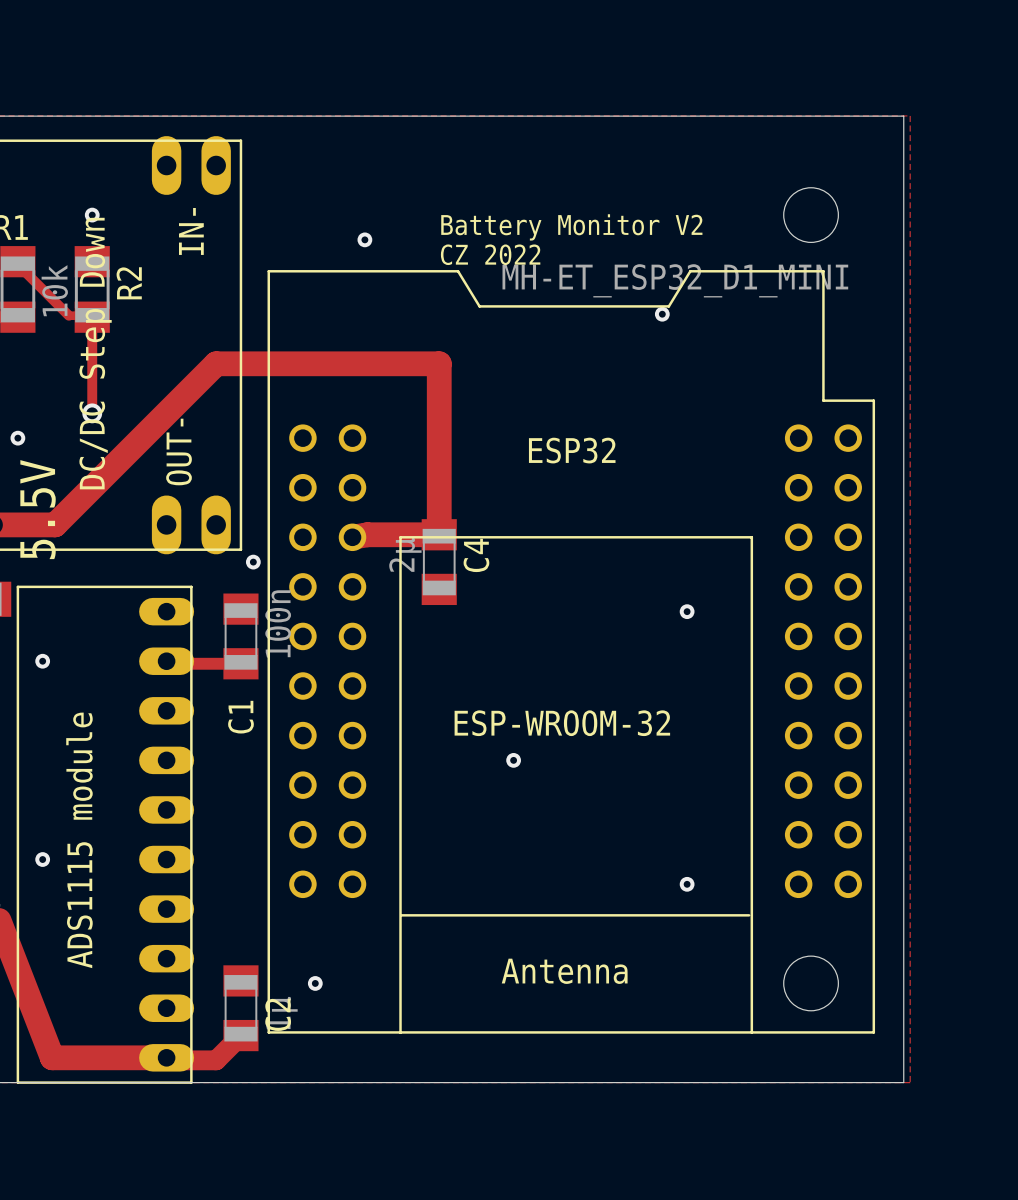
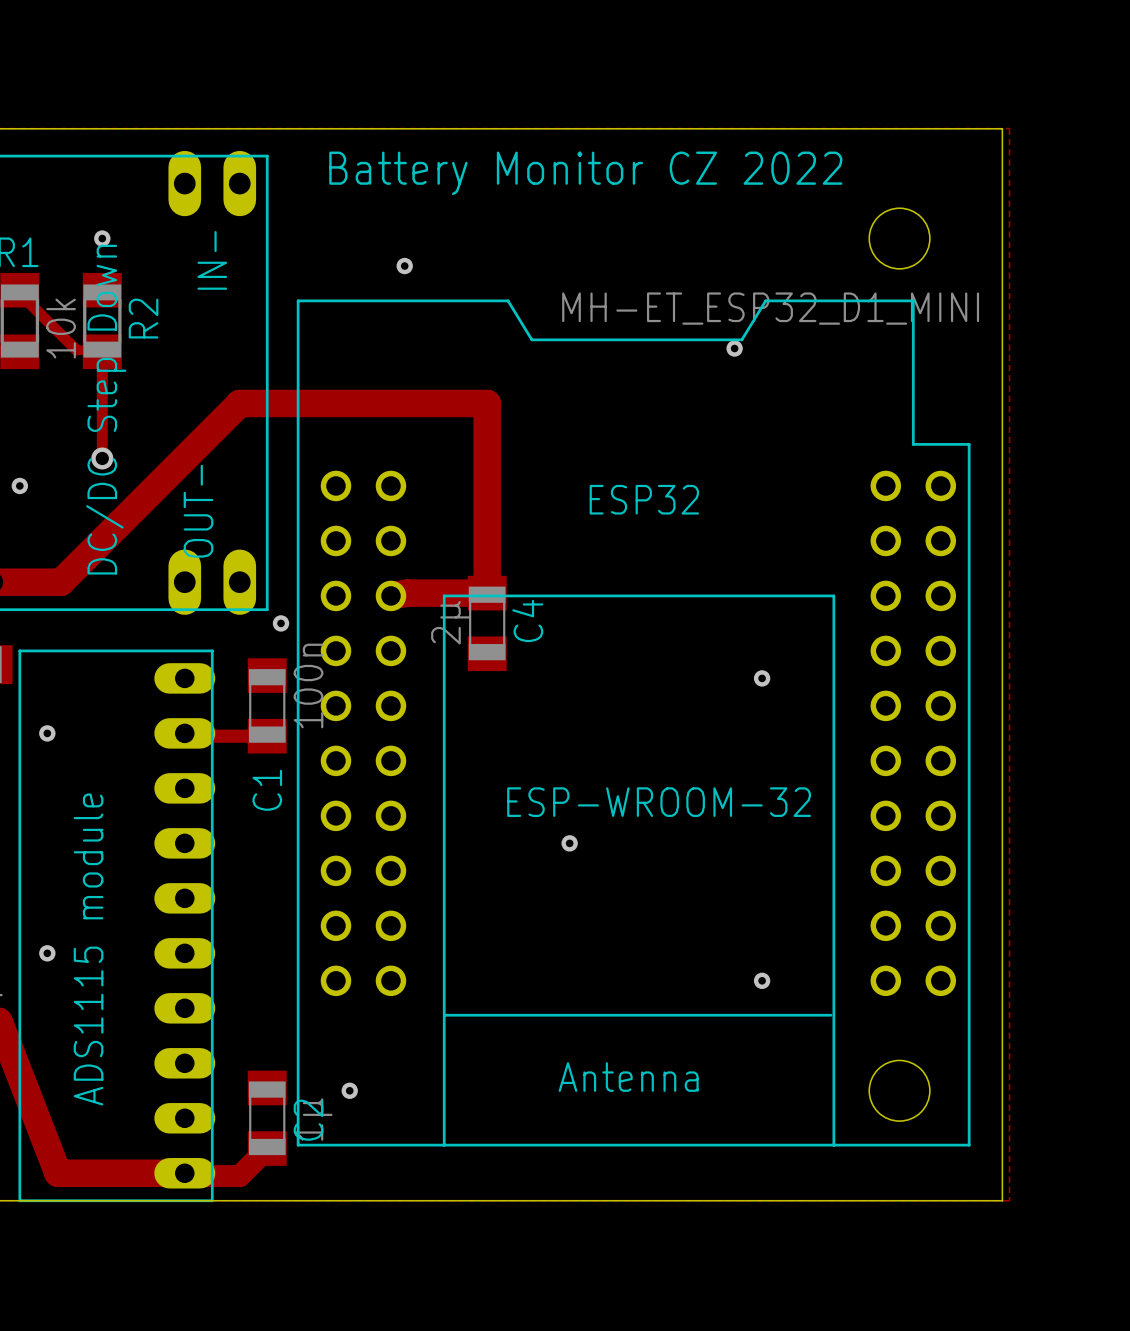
text: none -> Battery Monitor CZ 2022 (585, 173)
text: Battery Monitor V2 (571, 227) -> none
text: CZ 2022 (490, 254) -> none
text: 5.5V (38, 509) -> none

